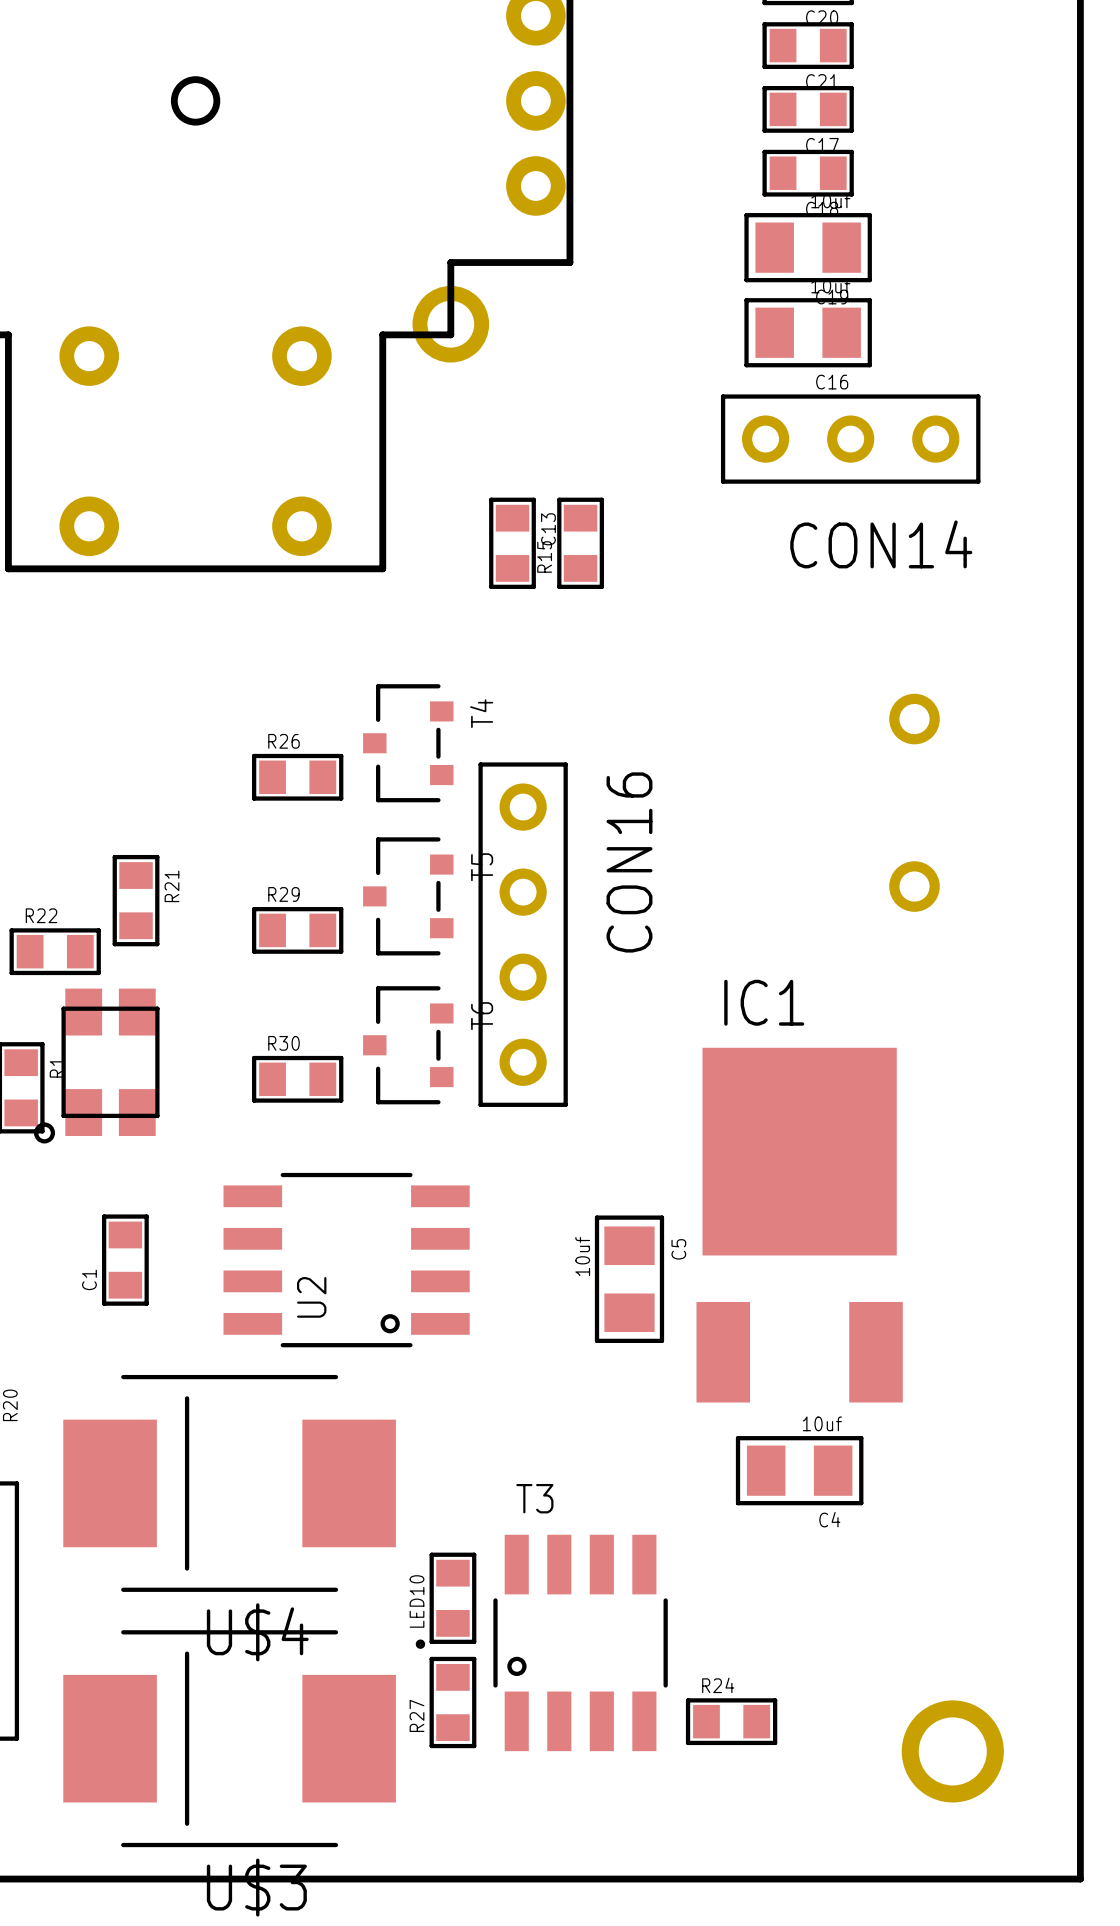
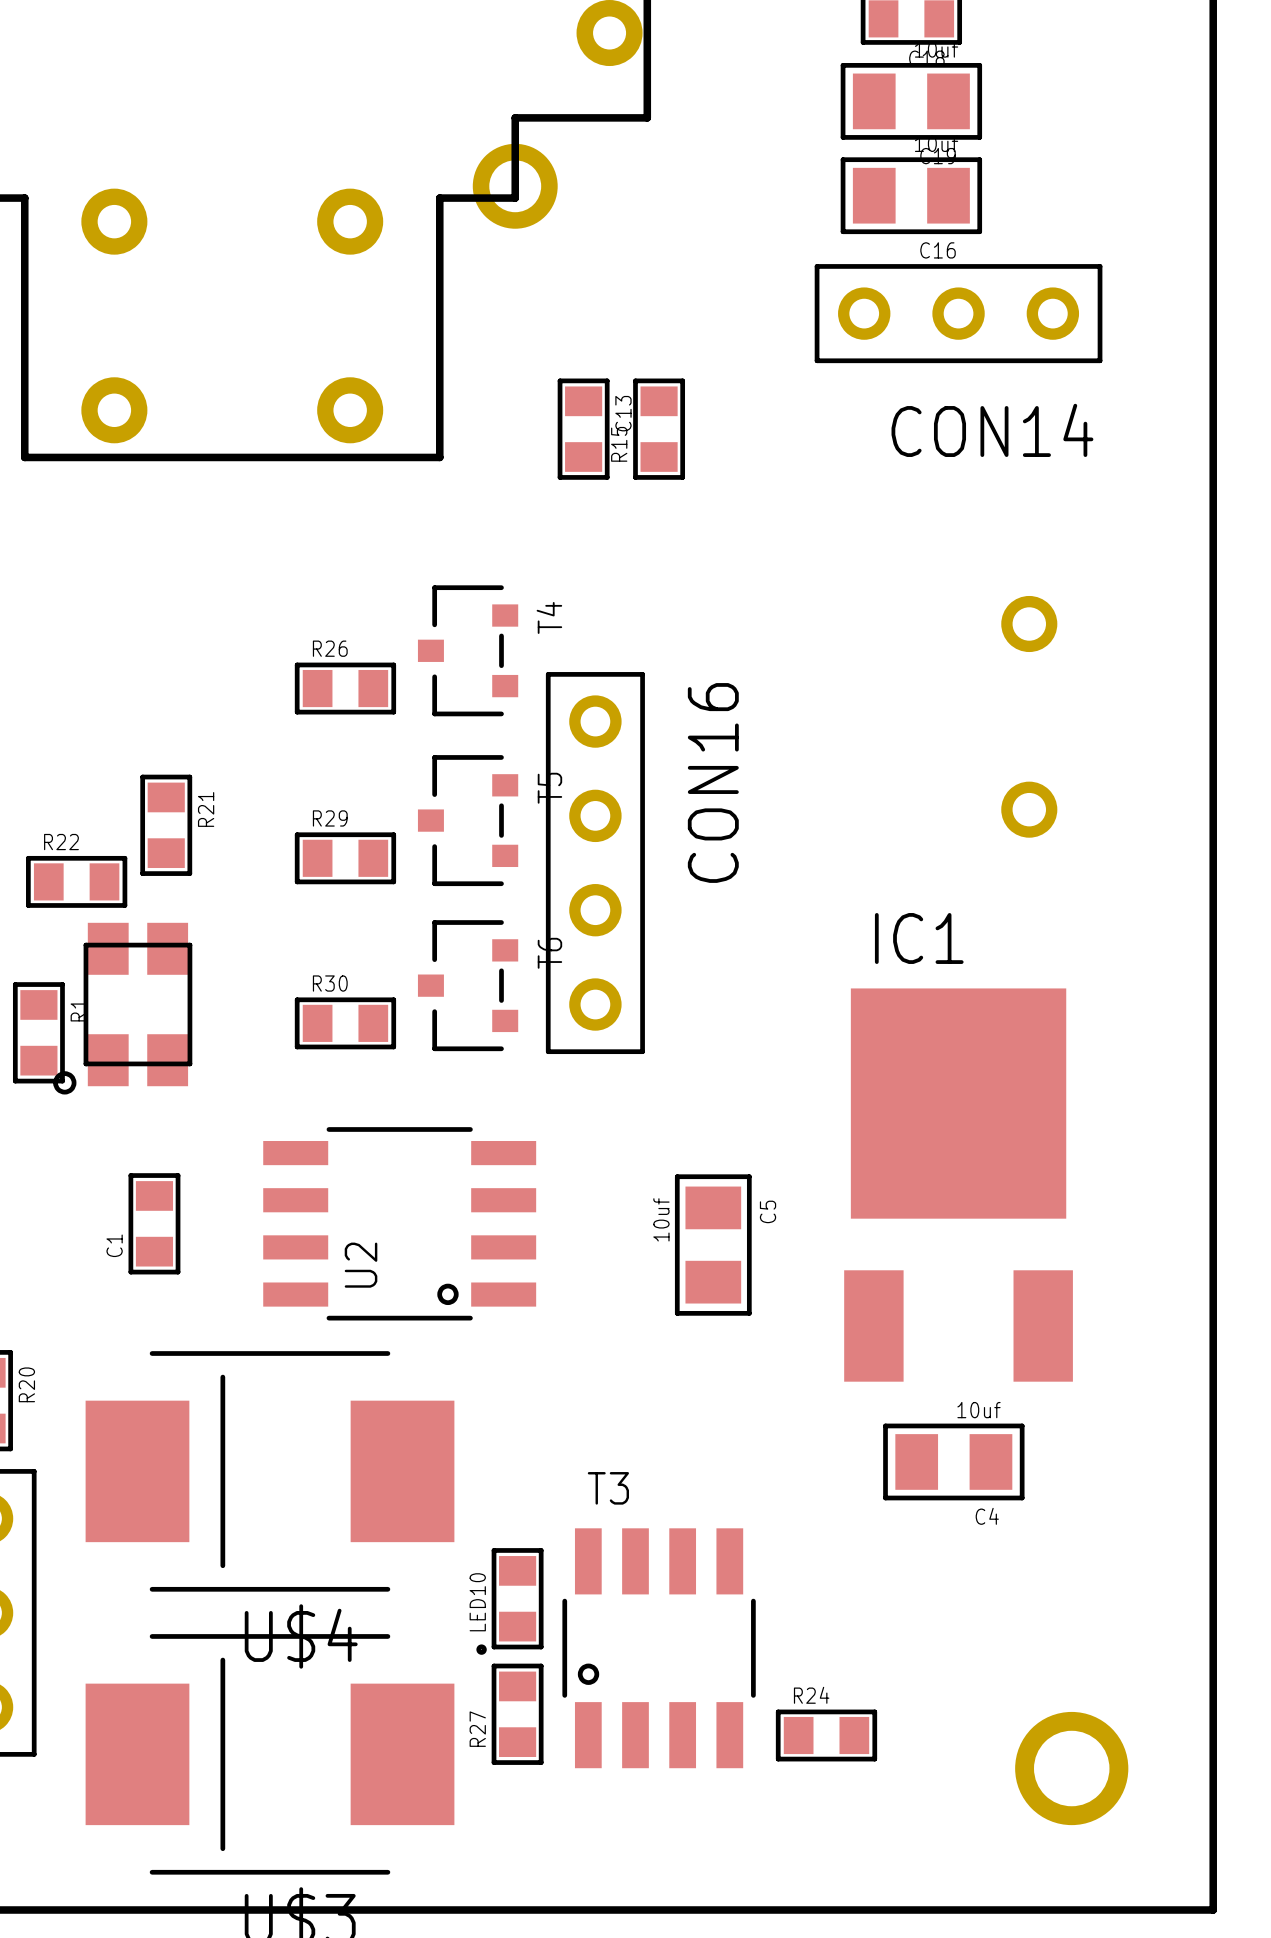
IC1 position: (799, 1225) -> (958, 1185)
C4 position: (799, 1470) -> (953, 1461)

